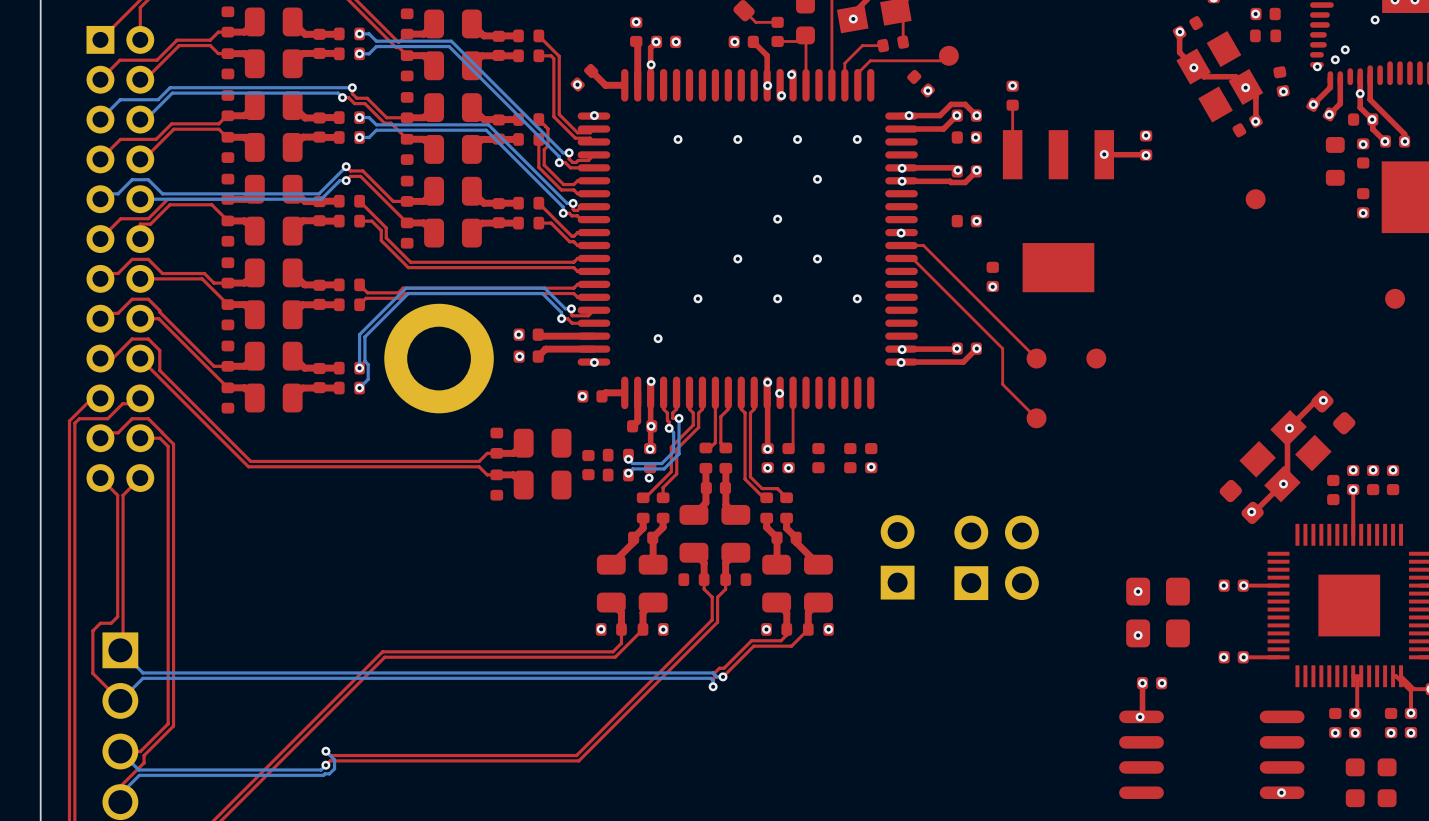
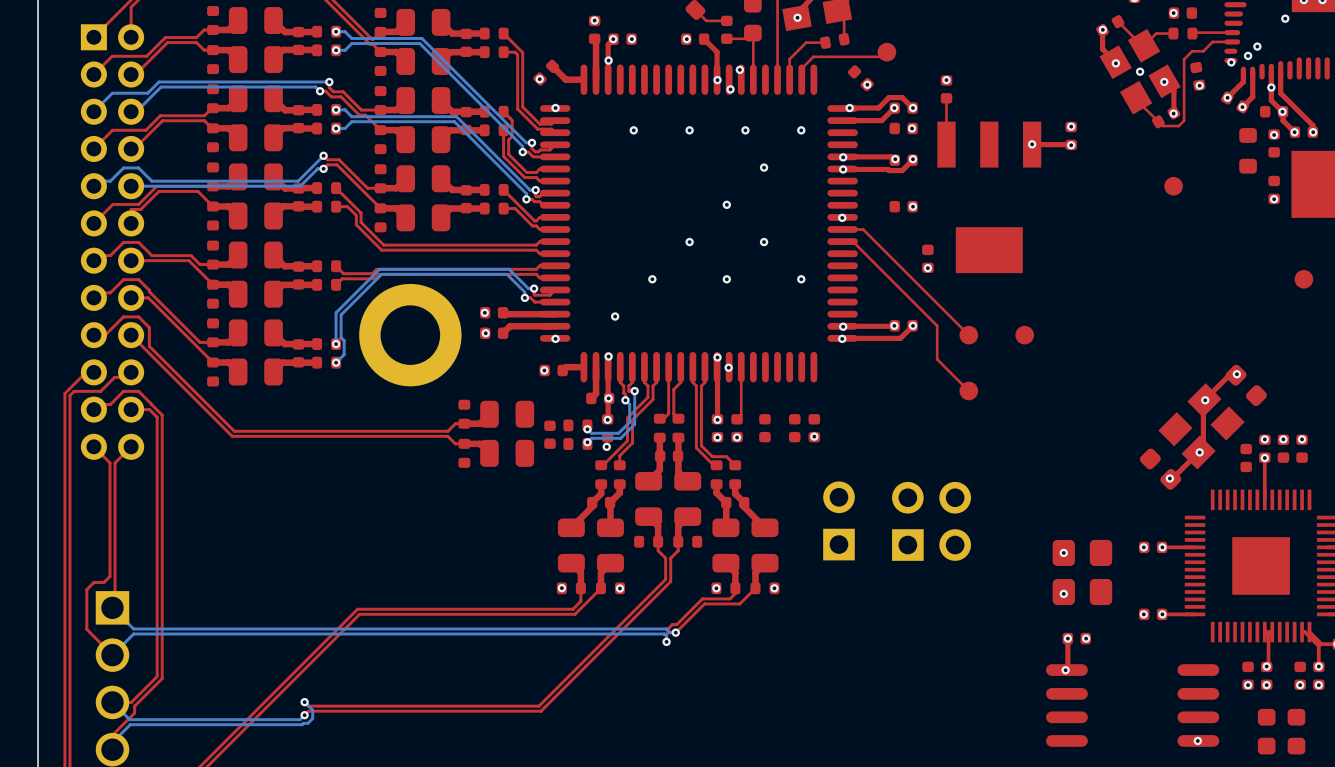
top track: none -> (1118, 21) (1142, 45) (1156, 33) (1173, 33)
top track: none -> (1232, 32) (1192, 33)
top track: none -> (1232, 41) (1212, 41) (1203, 51) (1192, 51) (1184, 59) (1184, 120) (1178, 126) (1162, 126) (1136, 97)
top track: (1193, 66) (1203, 76) (1235, 76) (1245, 86) -> none
via: none -> (1140, 71)

